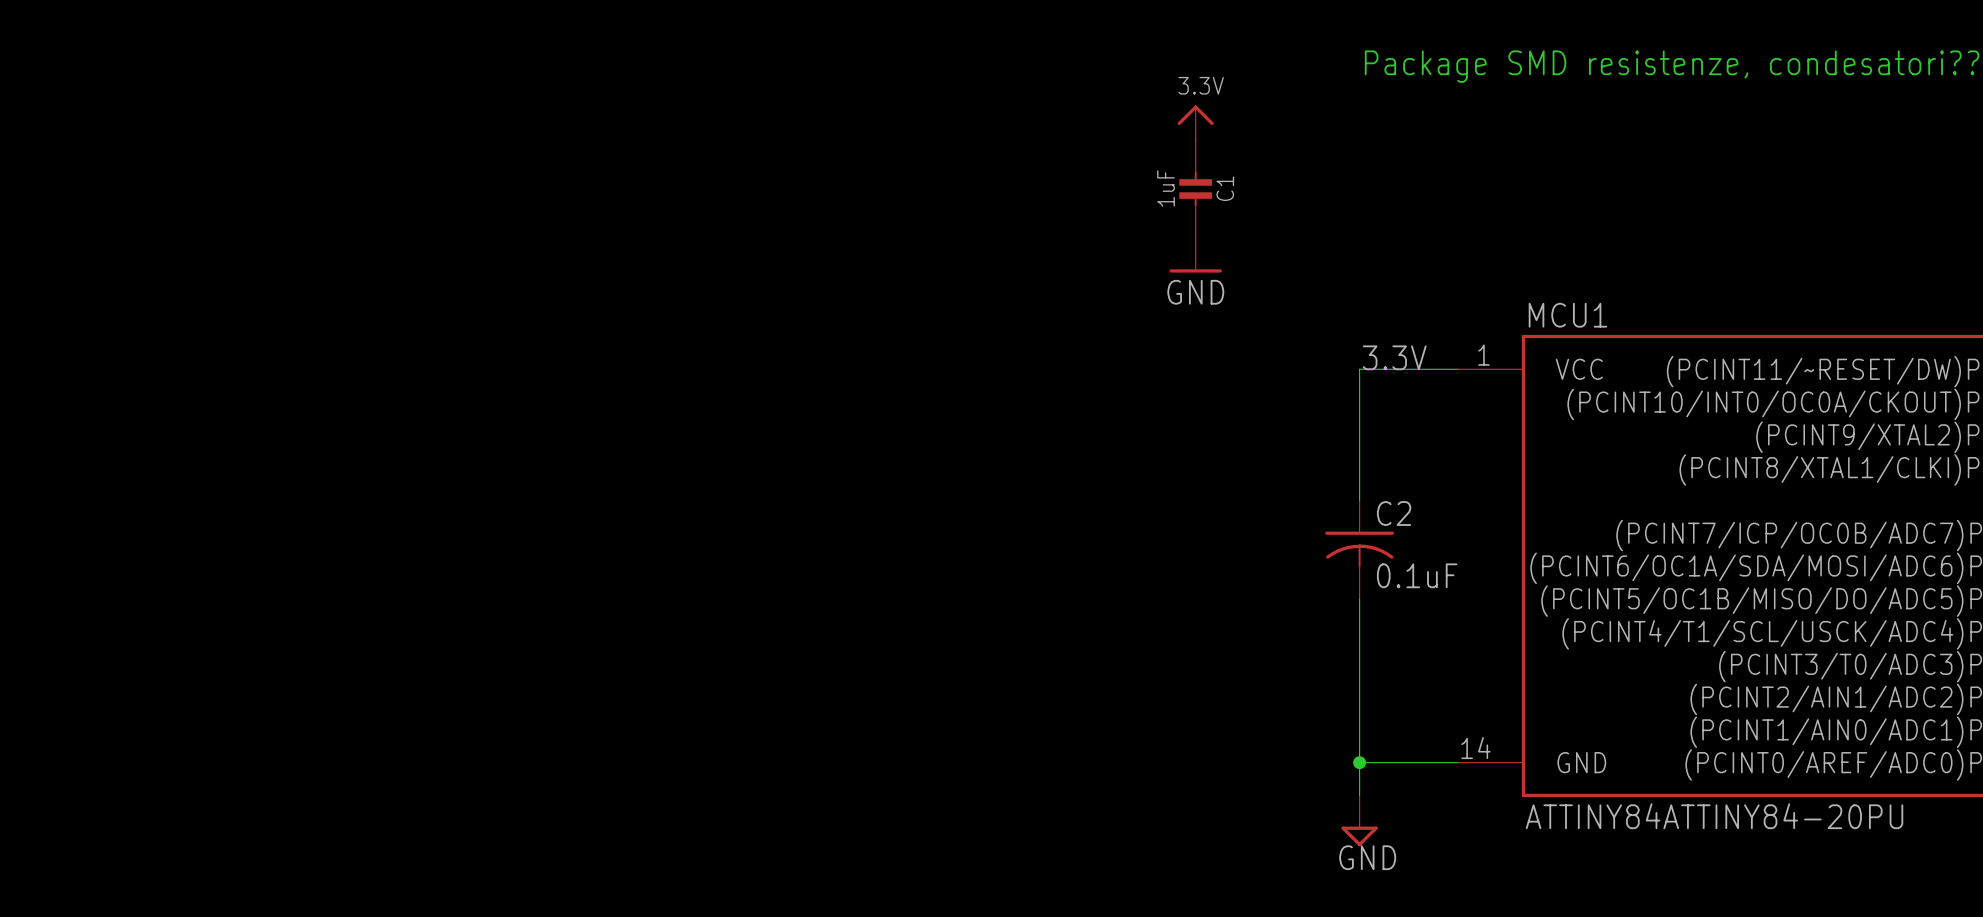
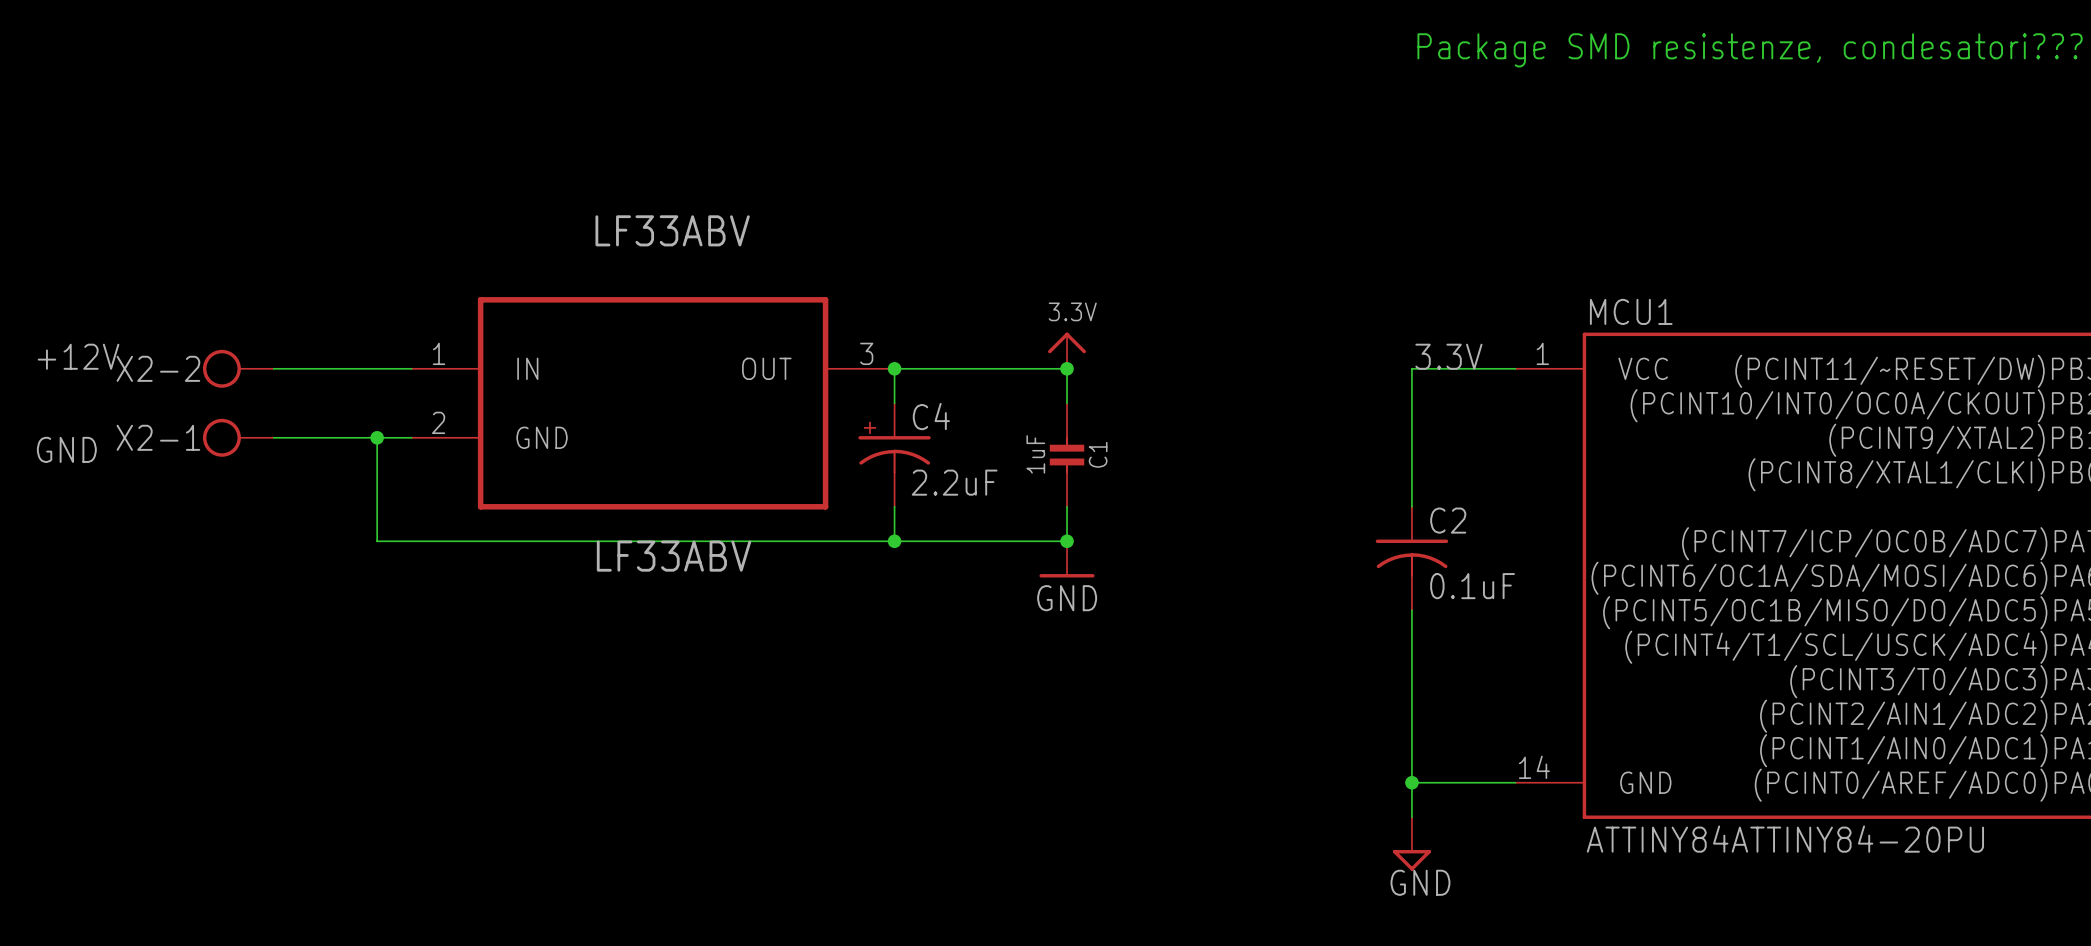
power symbol position: 3.3V (1195, 122) -> 3.3V (1067, 350)
C1 position: (1195, 189) -> (1067, 455)
power symbol: GND (1195, 255) -> none
label: none -> +12V (78, 356)
X2-2: none -> (238, 368)
wire: none -> (273, 368) (411, 368)
junction: none -> (894, 368)
junction: none -> (1067, 368)
LF33ABV: none -> LF33ABV (653, 403)
wire: none -> (894, 403) (894, 368) (1067, 368) (1067, 403)
X2-1: none -> (238, 437)
wire: none -> (273, 437) (411, 437)
wire: none -> (377, 437) (377, 541) (1067, 541) (1067, 506)
junction: none -> (377, 437)
label: none -> GND (66, 449)
C4: none -> 2.2uF (894, 455)
wire: none -> (894, 506) (894, 541)
junction: none -> (894, 541)
junction: none -> (1067, 541)
power symbol: none -> GND (1067, 559)

